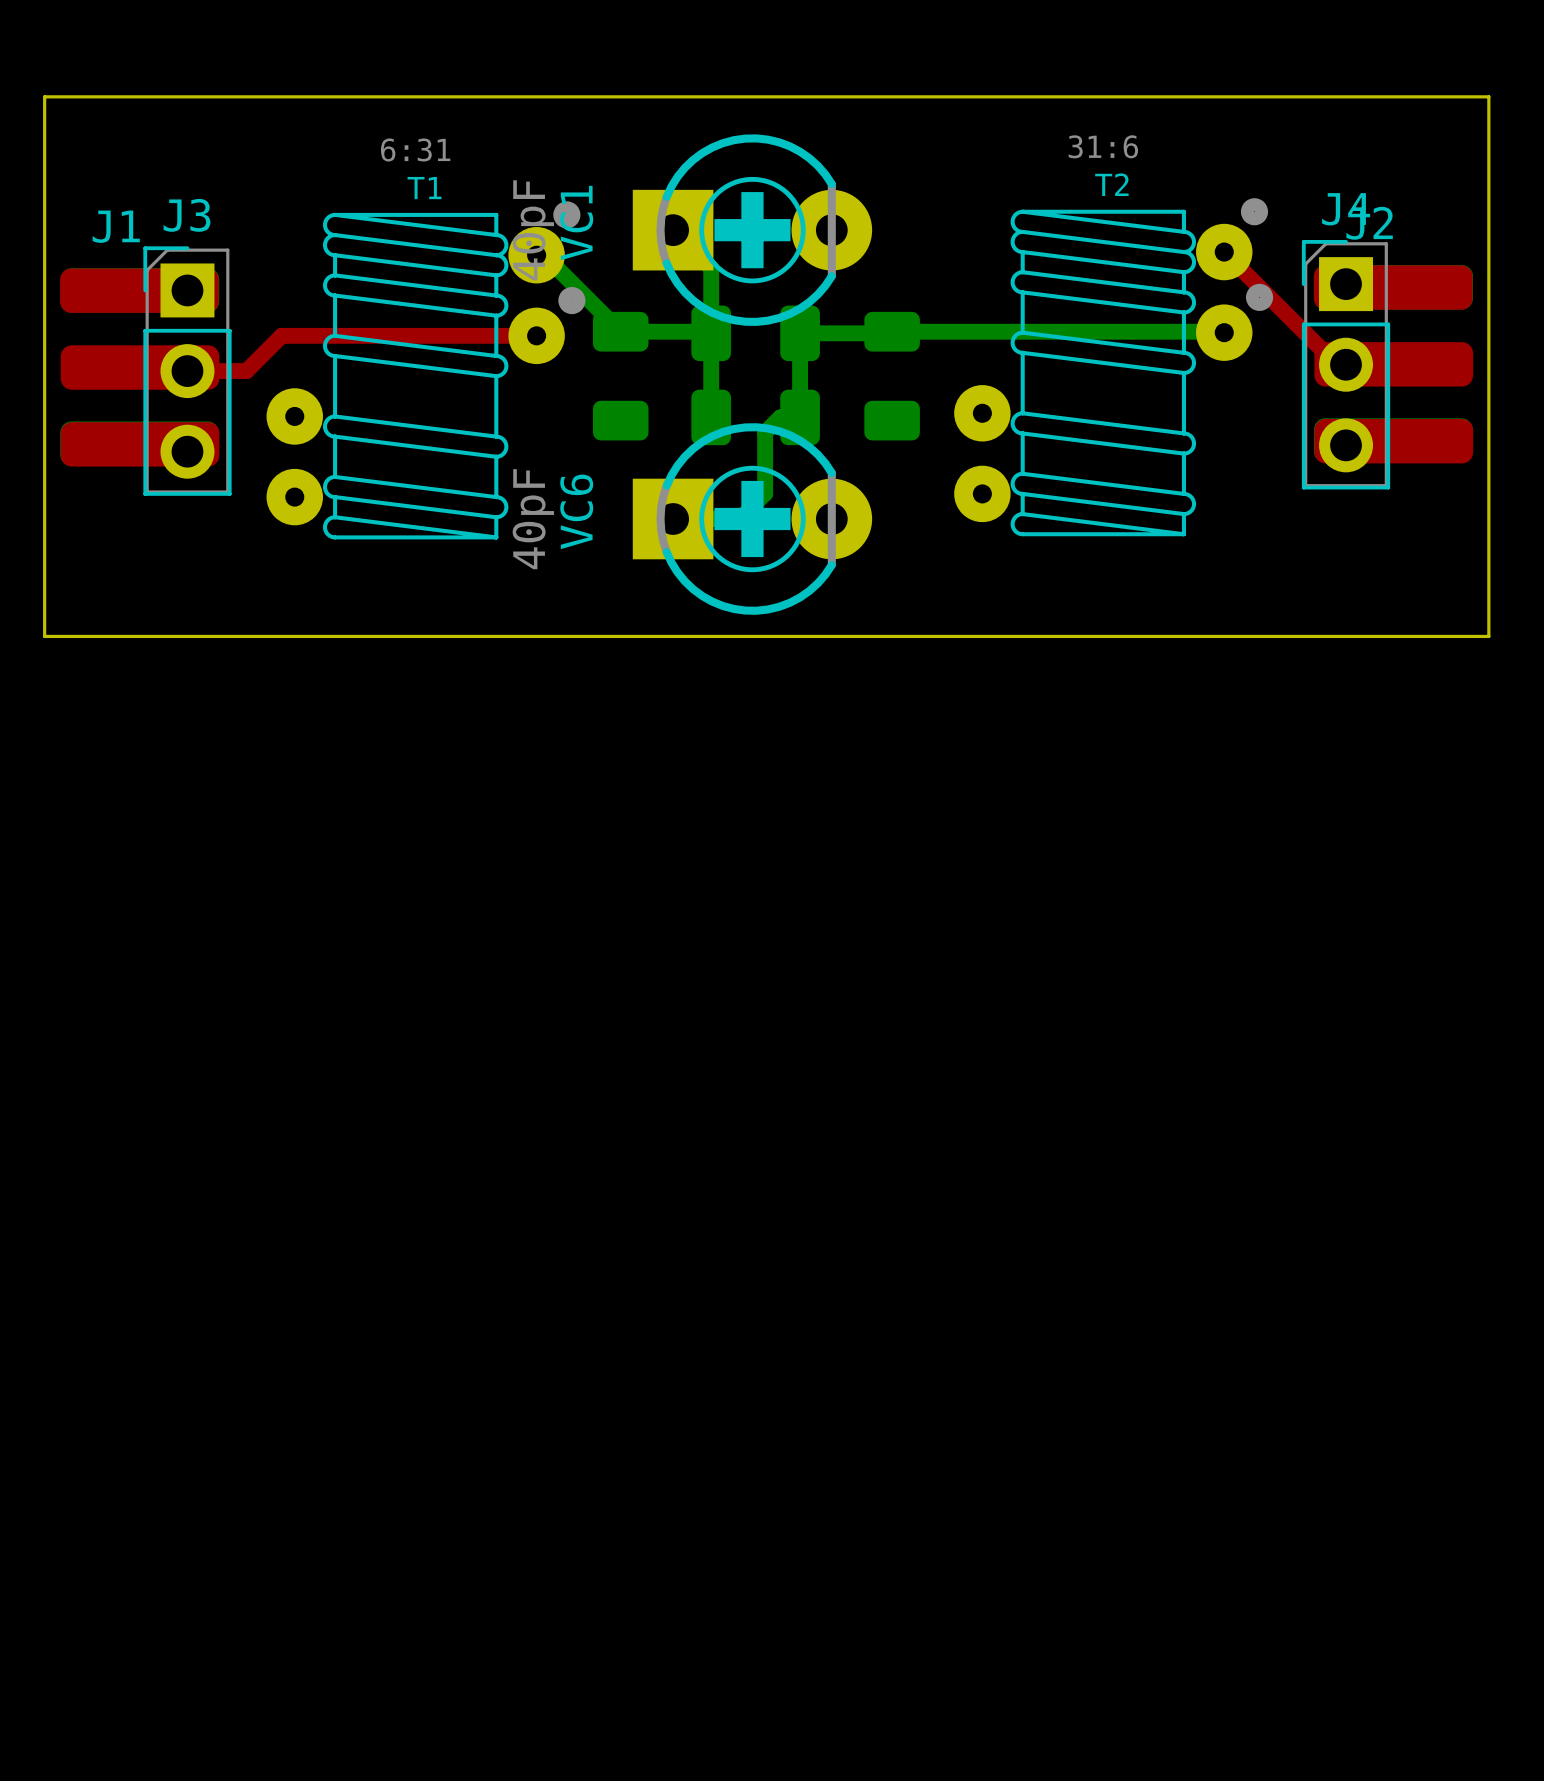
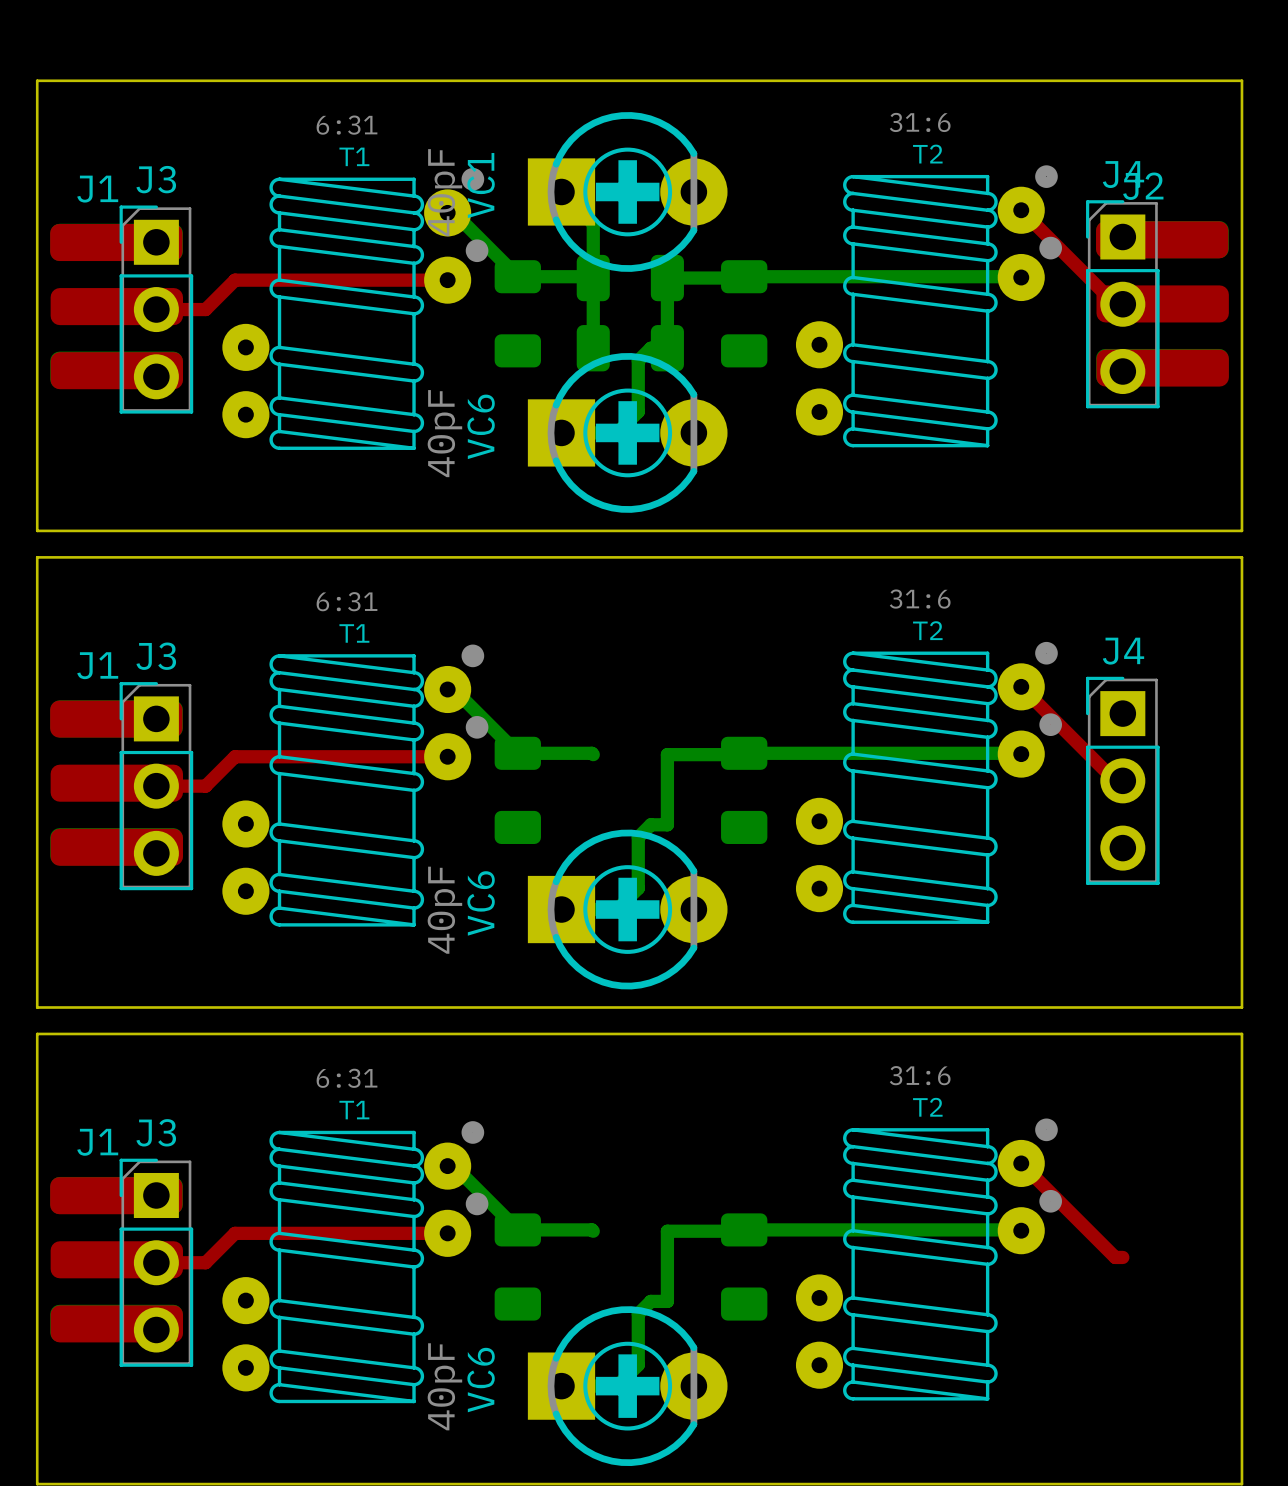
board edge: none -> (37, 557) (37, 1007) (1241, 1007) (1241, 557) (37, 557)
top track: none -> (1021, 686) (1115, 780) (1122, 780)
bottom track: none -> (447, 689) (454, 689) (517, 753) (593, 754)
bottom track: none -> (1020, 753) (667, 754) (667, 824) (650, 824) (638, 837) (638, 888) (617, 909) (561, 909)
top track: none -> (447, 756) (235, 756) (205, 786) (156, 786)
J4: none -> (1122, 780)
J1: none -> (116, 783)
T2: none -> 31:6 (928, 782)
T1: none -> 6:31 (355, 785)
J3: none -> (156, 786)
part: none -> (517, 790)
part: none -> (744, 790)
VC6: none -> 40pF (627, 909)
board edge: none -> (37, 1033) (1241, 1033) (1241, 1484) (37, 1484) (37, 1033)
top track: none -> (1021, 1163) (1115, 1257) (1122, 1257)
bottom track: none -> (447, 1166) (454, 1166) (517, 1229) (593, 1231)
bottom track: none -> (1020, 1229) (667, 1231) (667, 1301) (650, 1301) (638, 1313) (638, 1364) (617, 1386) (561, 1386)
top track: none -> (447, 1233) (235, 1233) (205, 1262) (156, 1262)
T2: none -> 31:6 (928, 1259)
J1: none -> (116, 1259)
J3: none -> (156, 1262)
T1: none -> 6:31 (355, 1262)
part: none -> (517, 1266)
part: none -> (744, 1266)
VC6: none -> 40pF (627, 1386)

